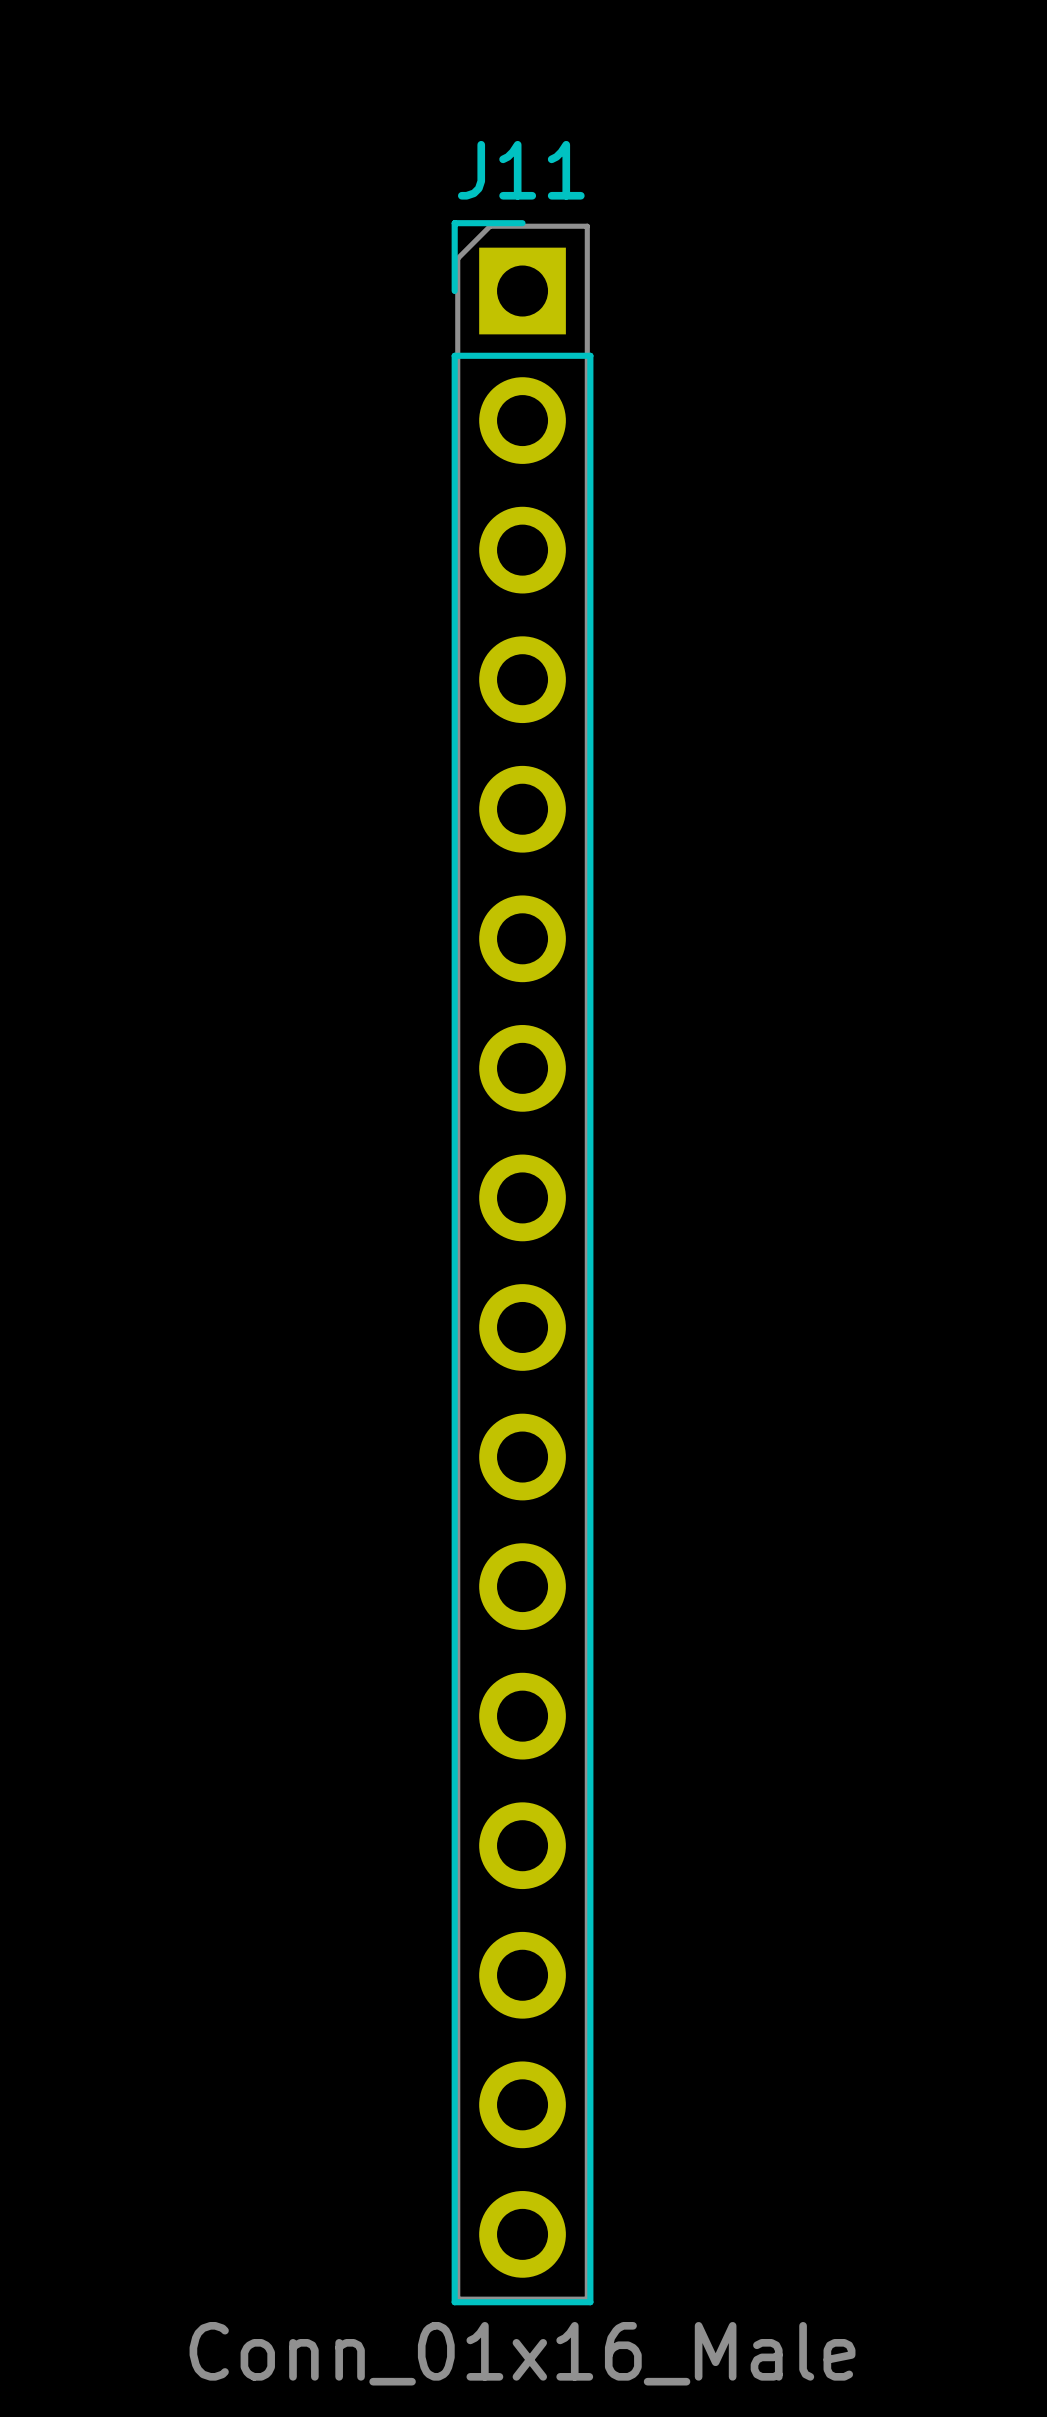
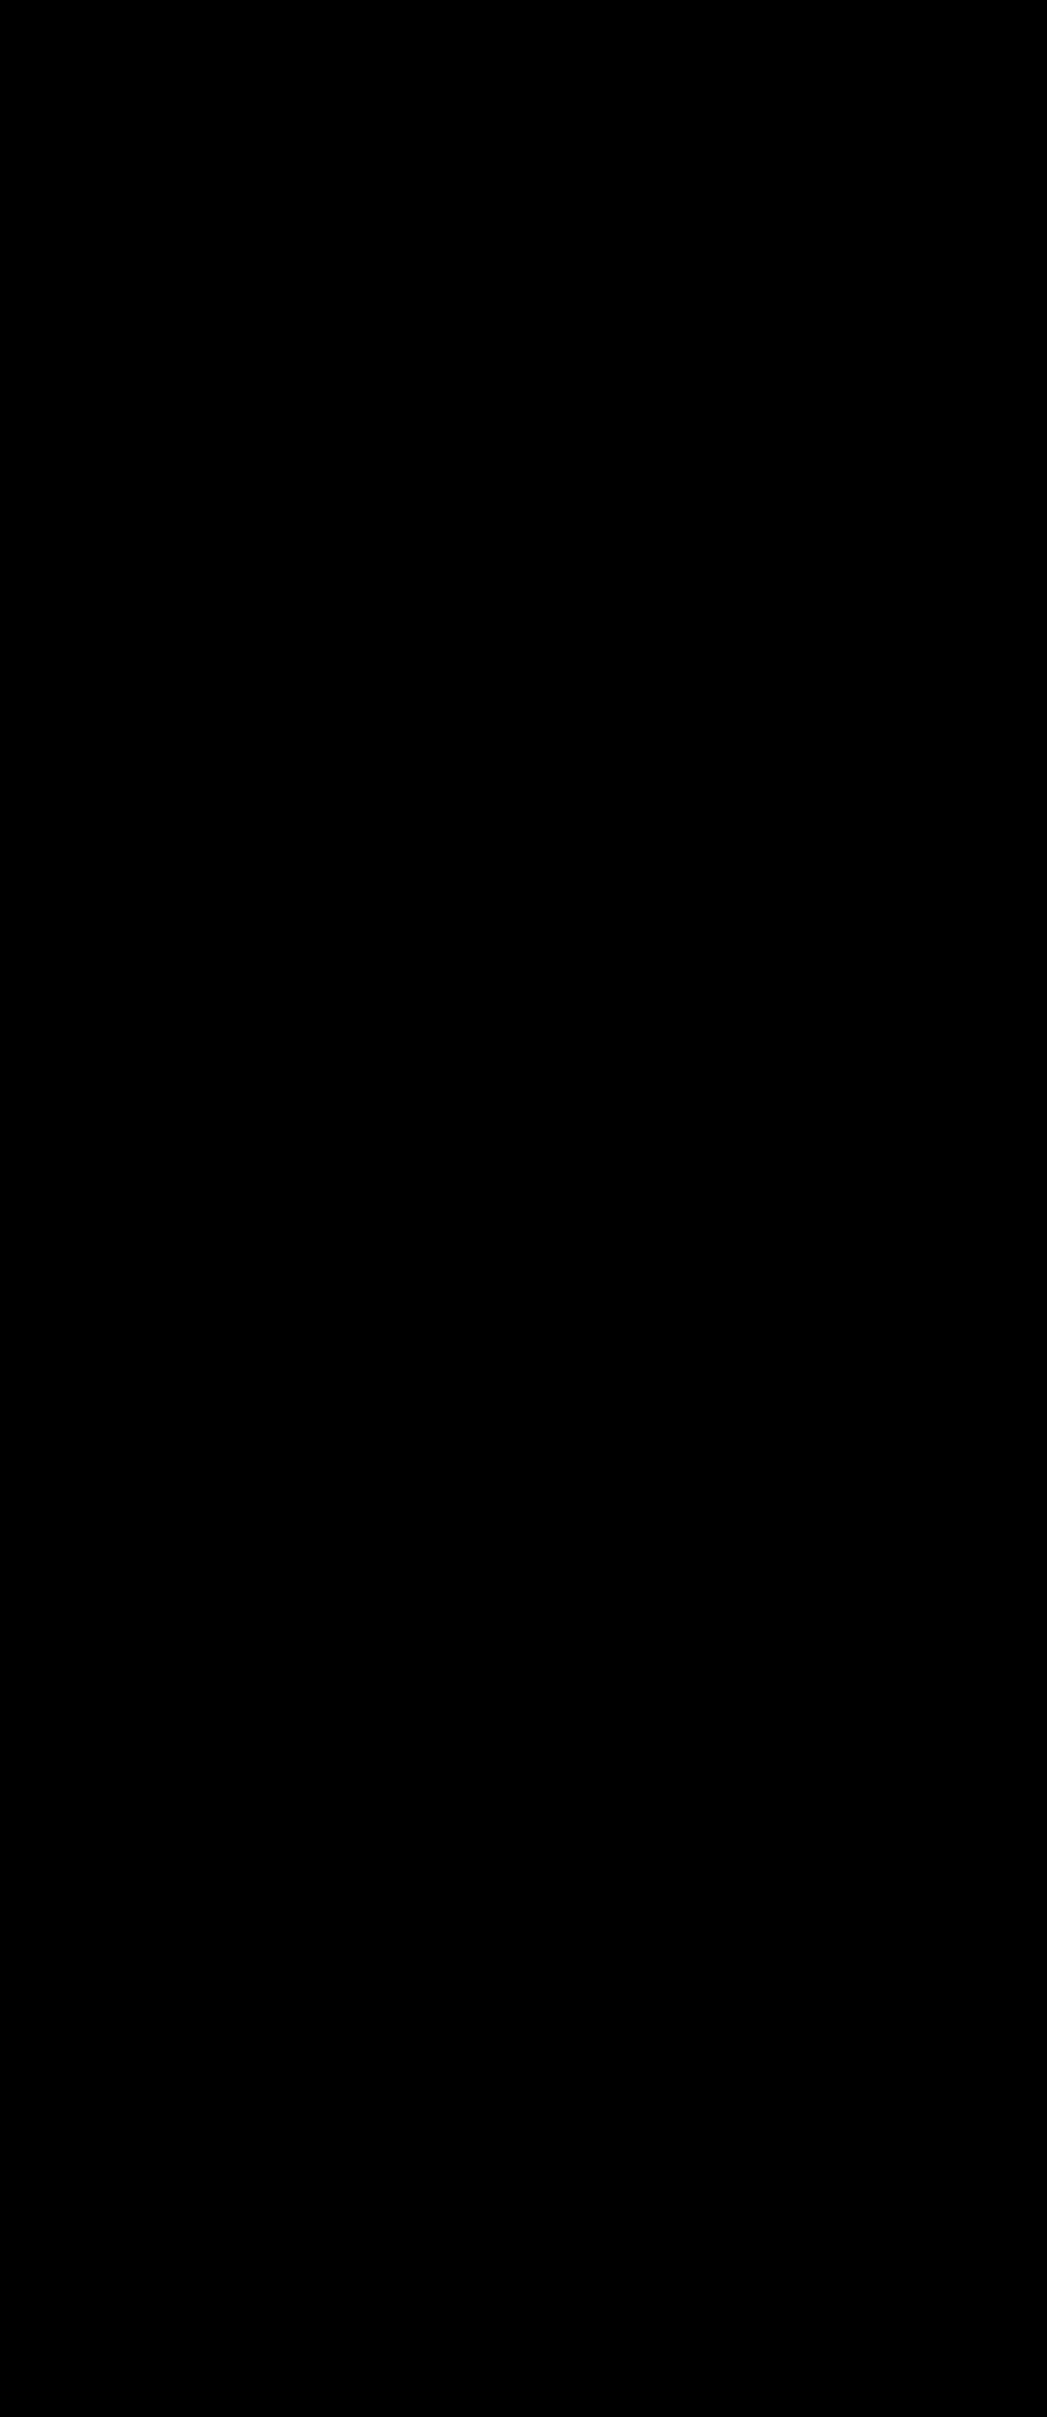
J11: Conn_01x16_Male (522, 1262) -> none

